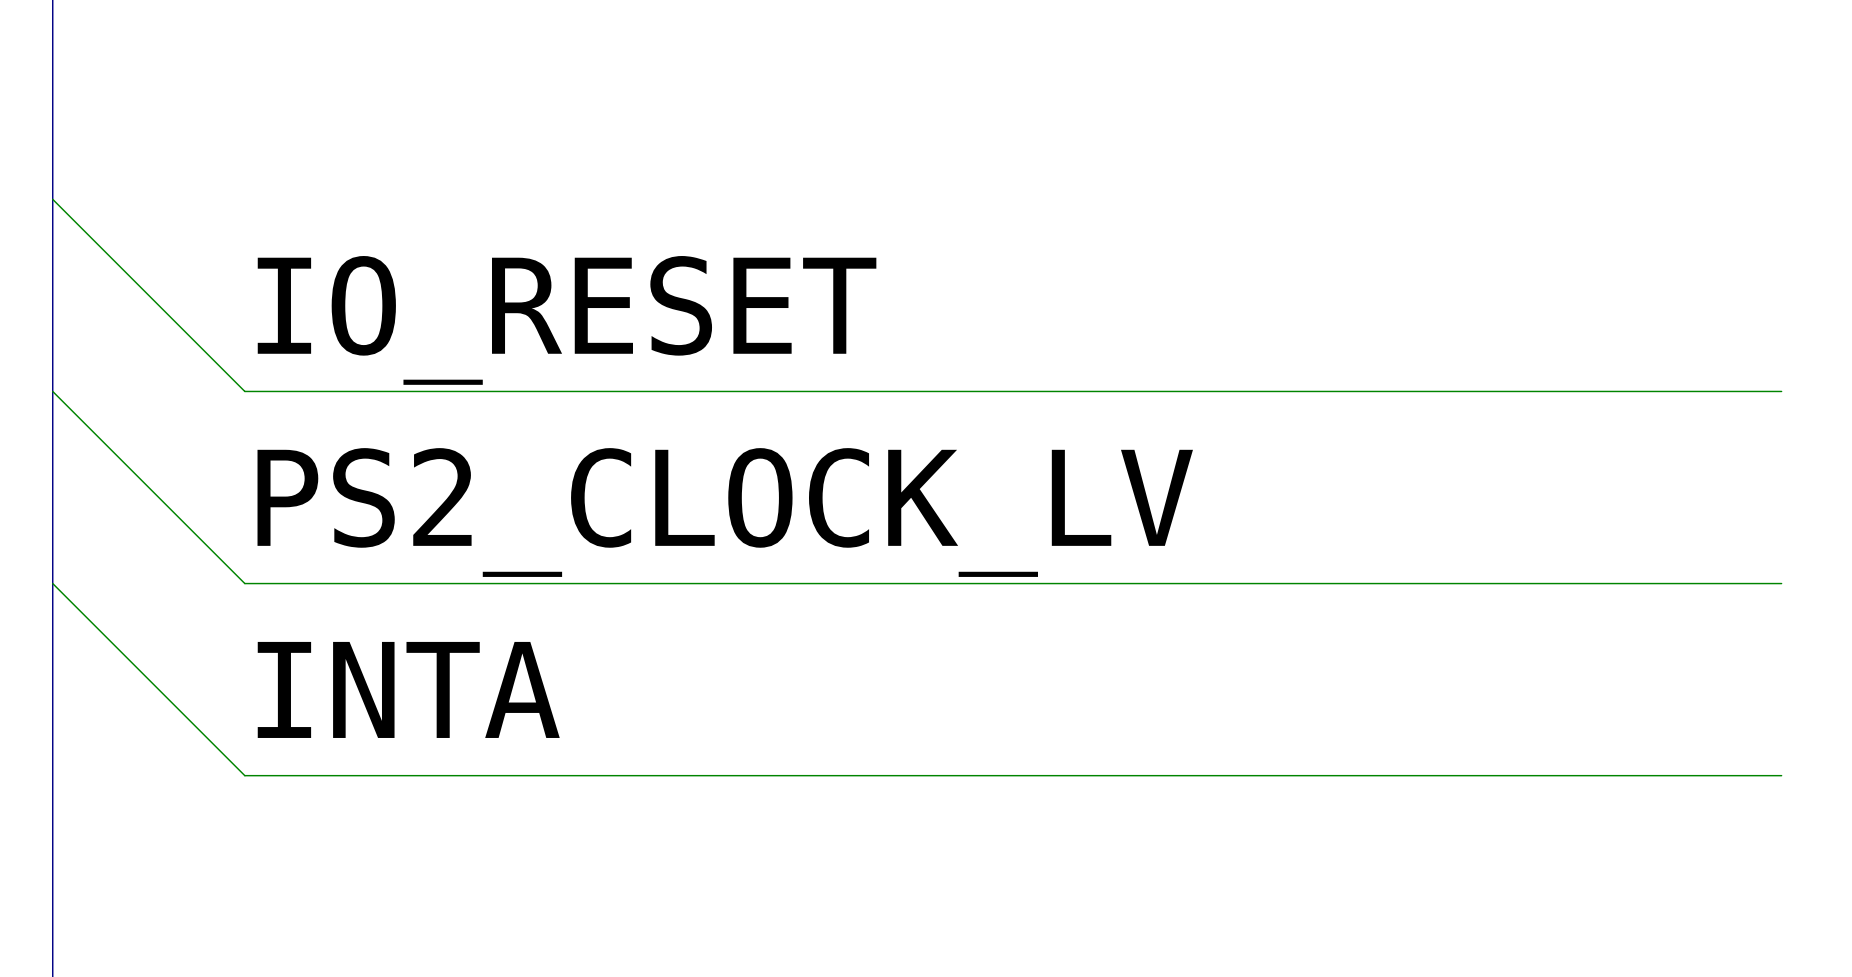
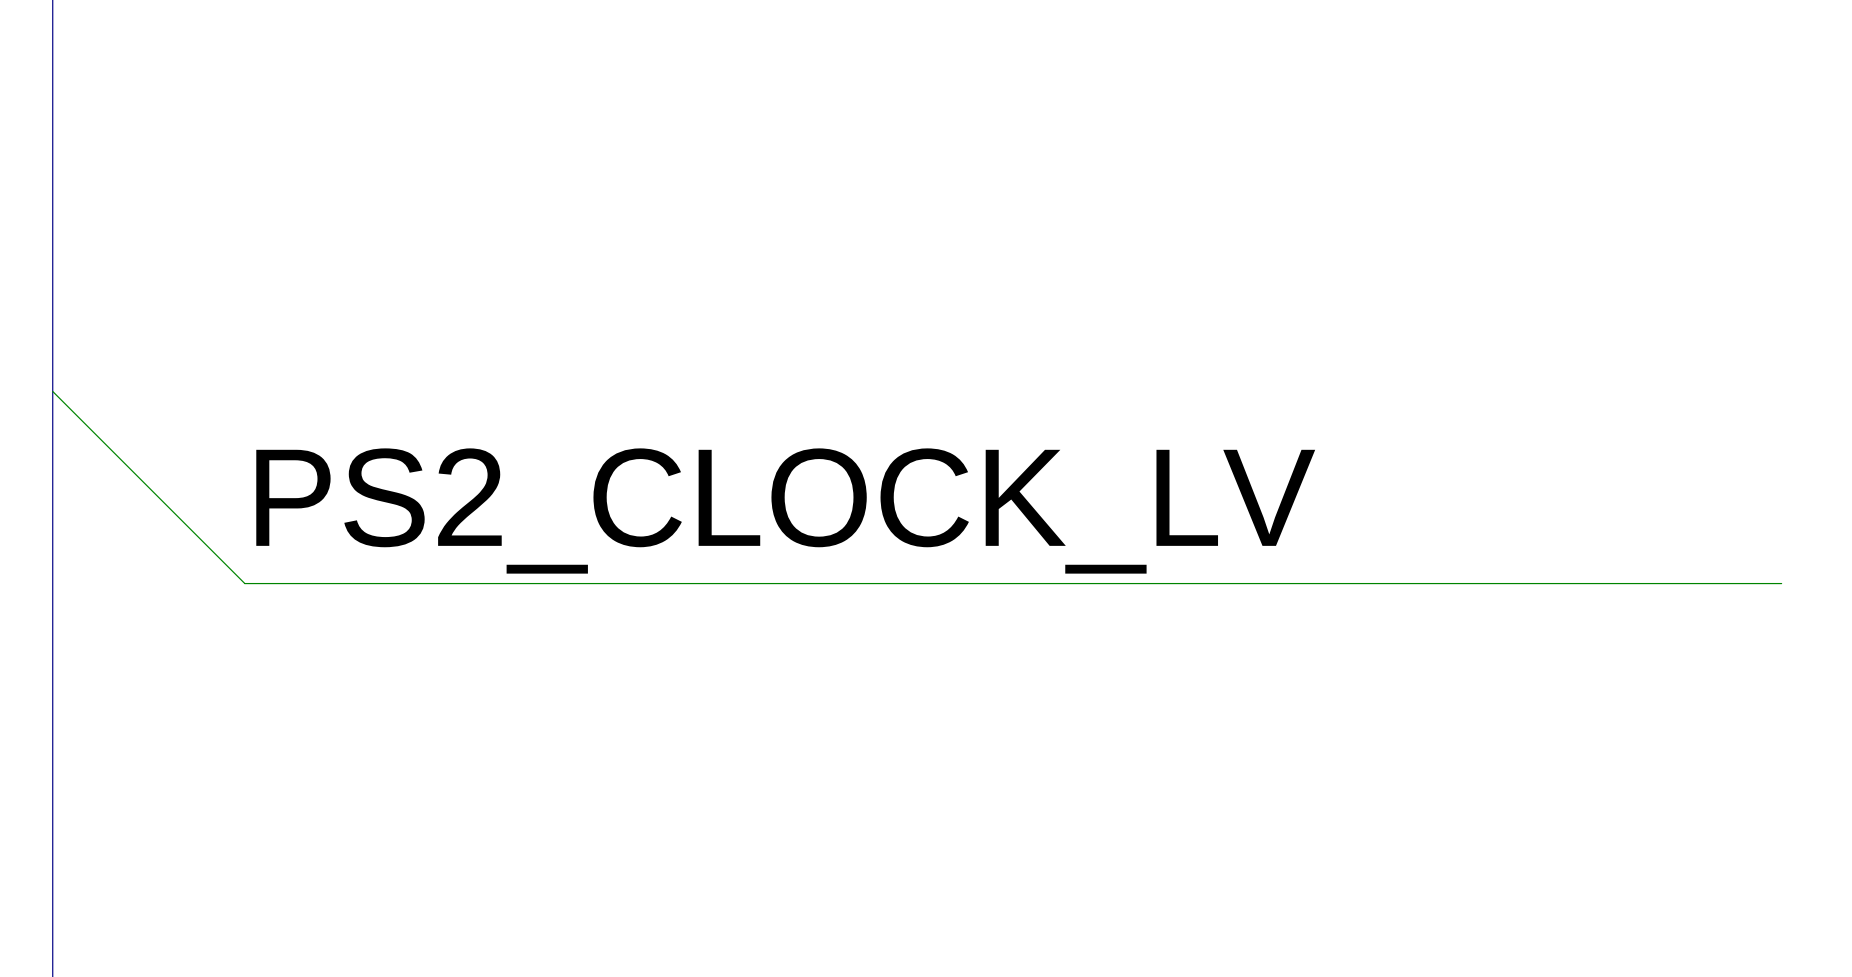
wire: (52, 199) (244, 391) (1781, 391) -> none
label: IO_RESET (567, 320) -> none
wire: (52, 583) (244, 775) (1781, 775) -> none
label: INTA (408, 689) -> none

